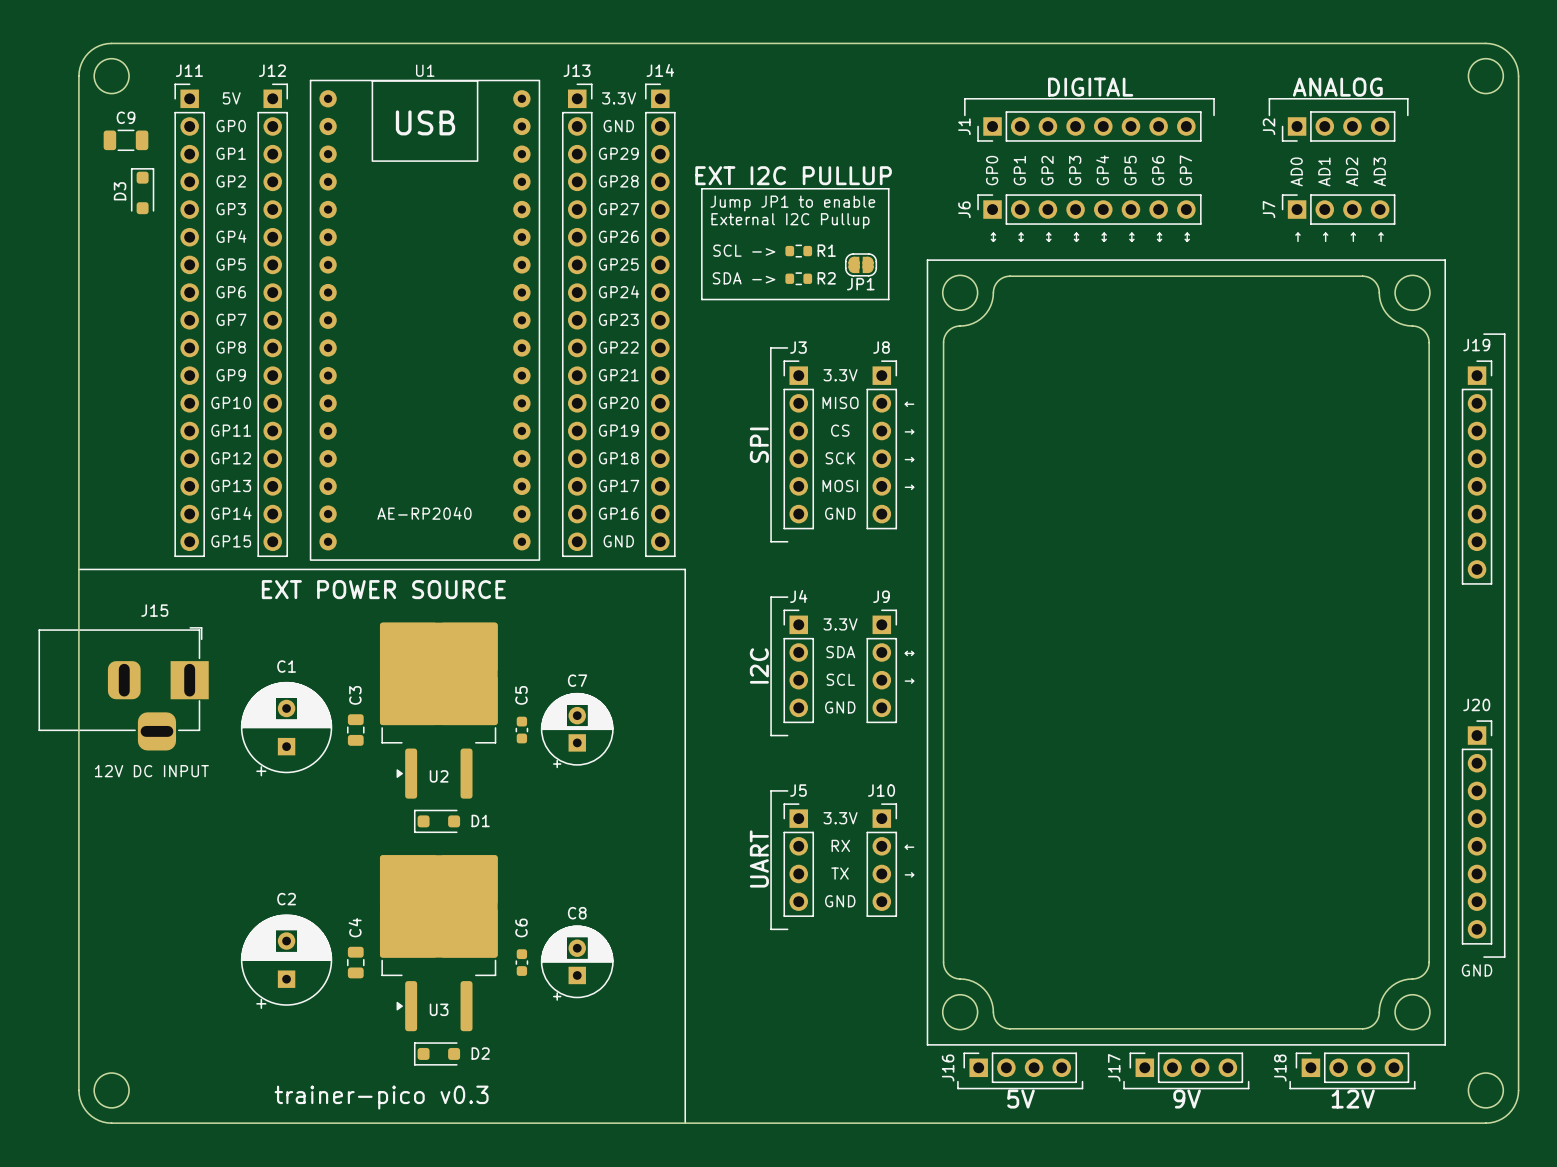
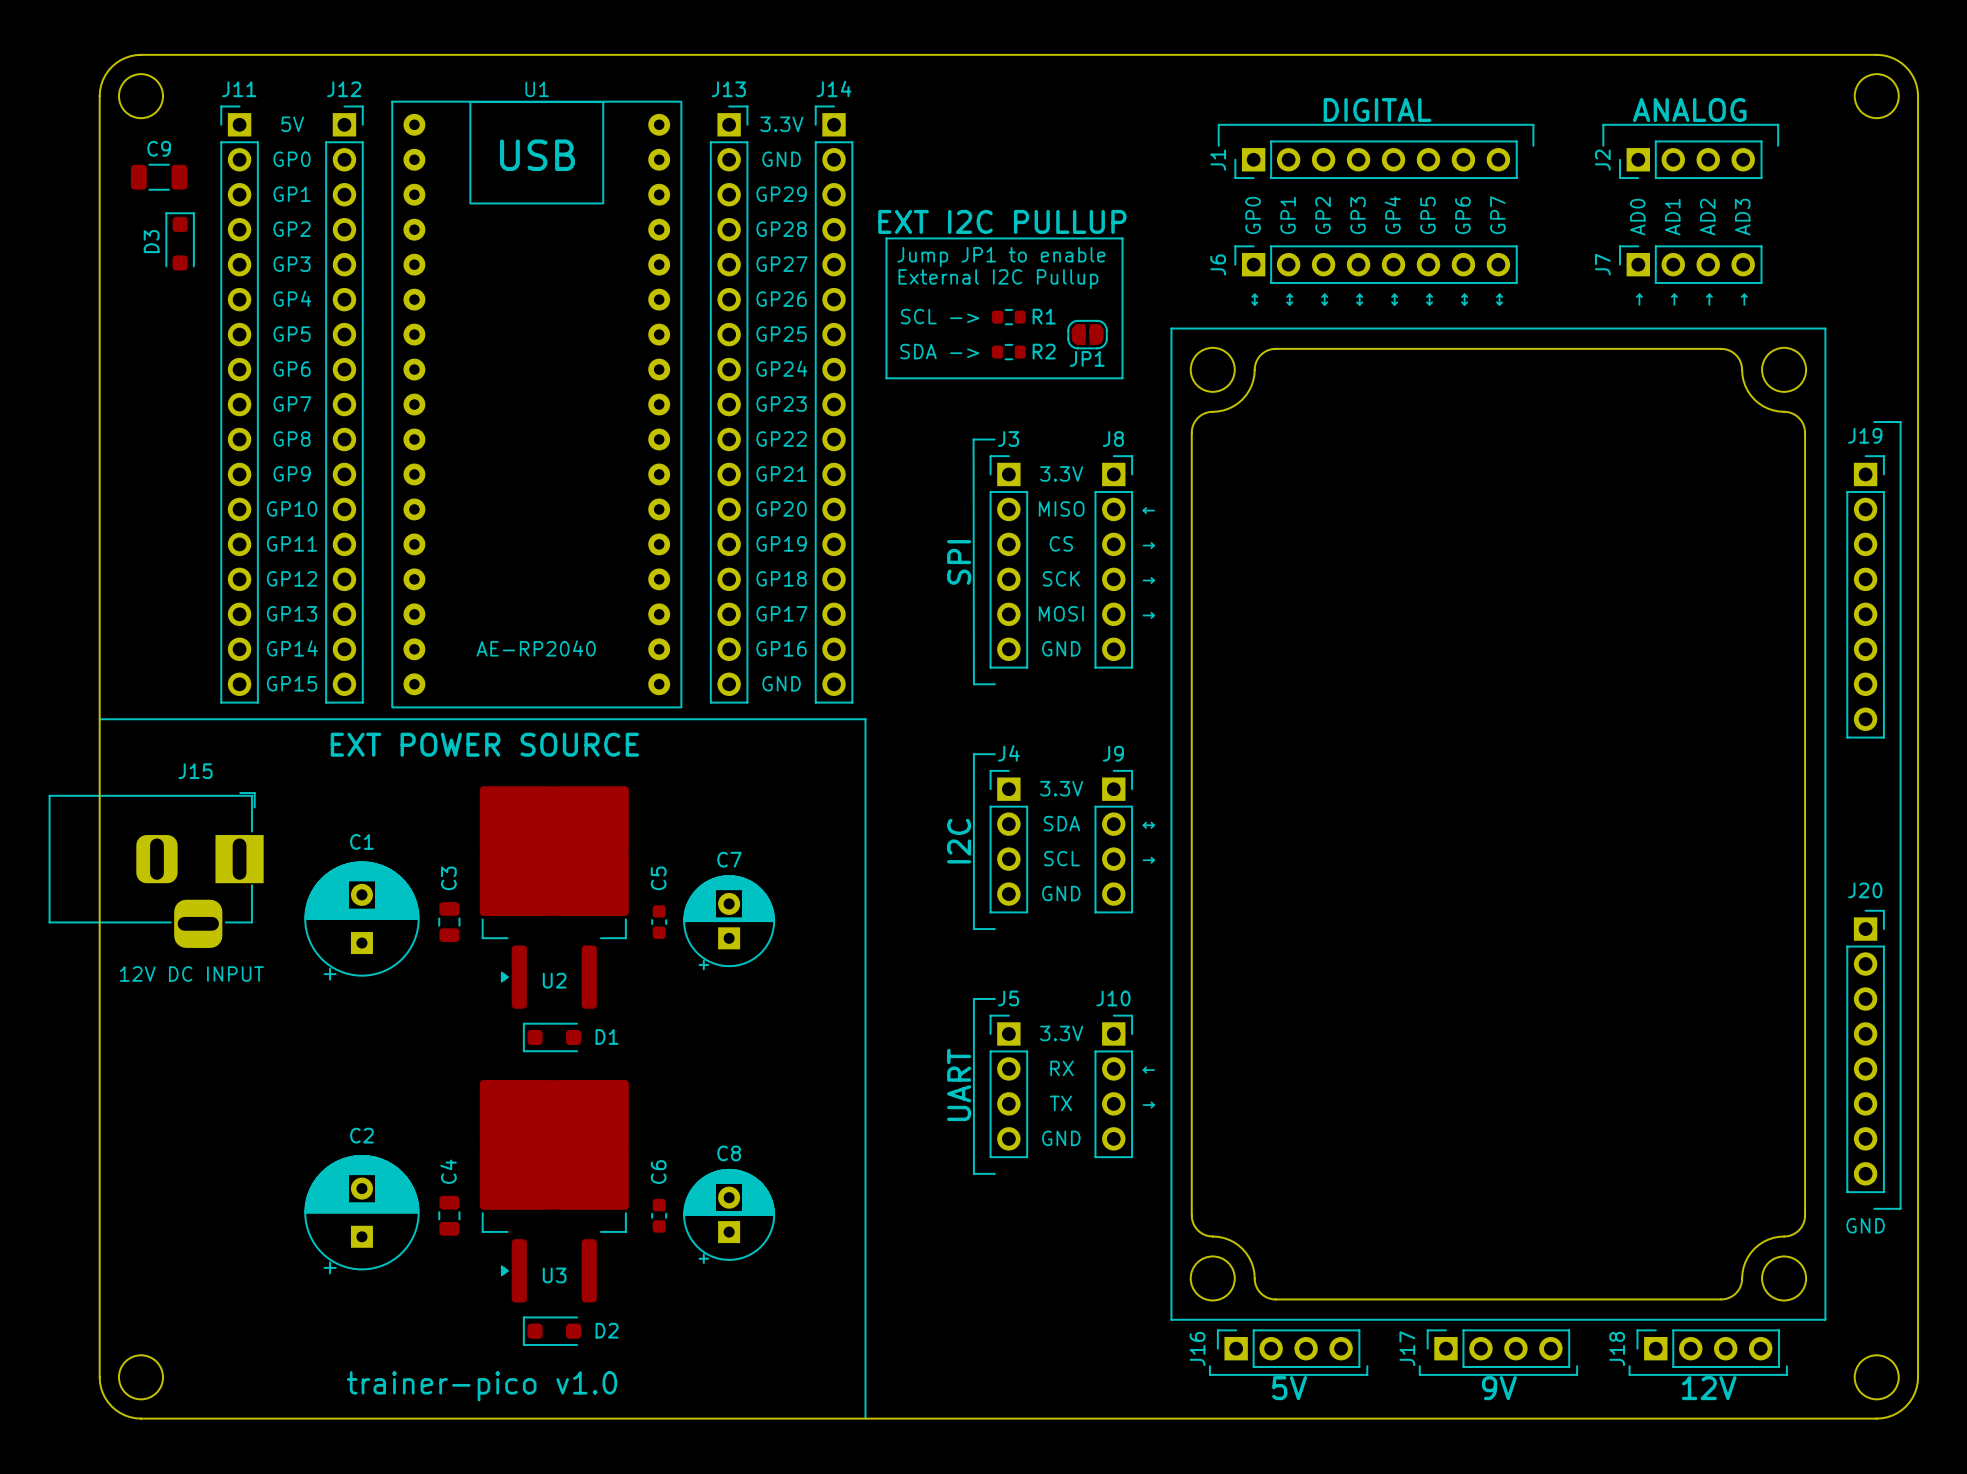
text: trainer-pico v0.3 (381, 1097) -> trainer-pico v1.0 (481, 1386)

